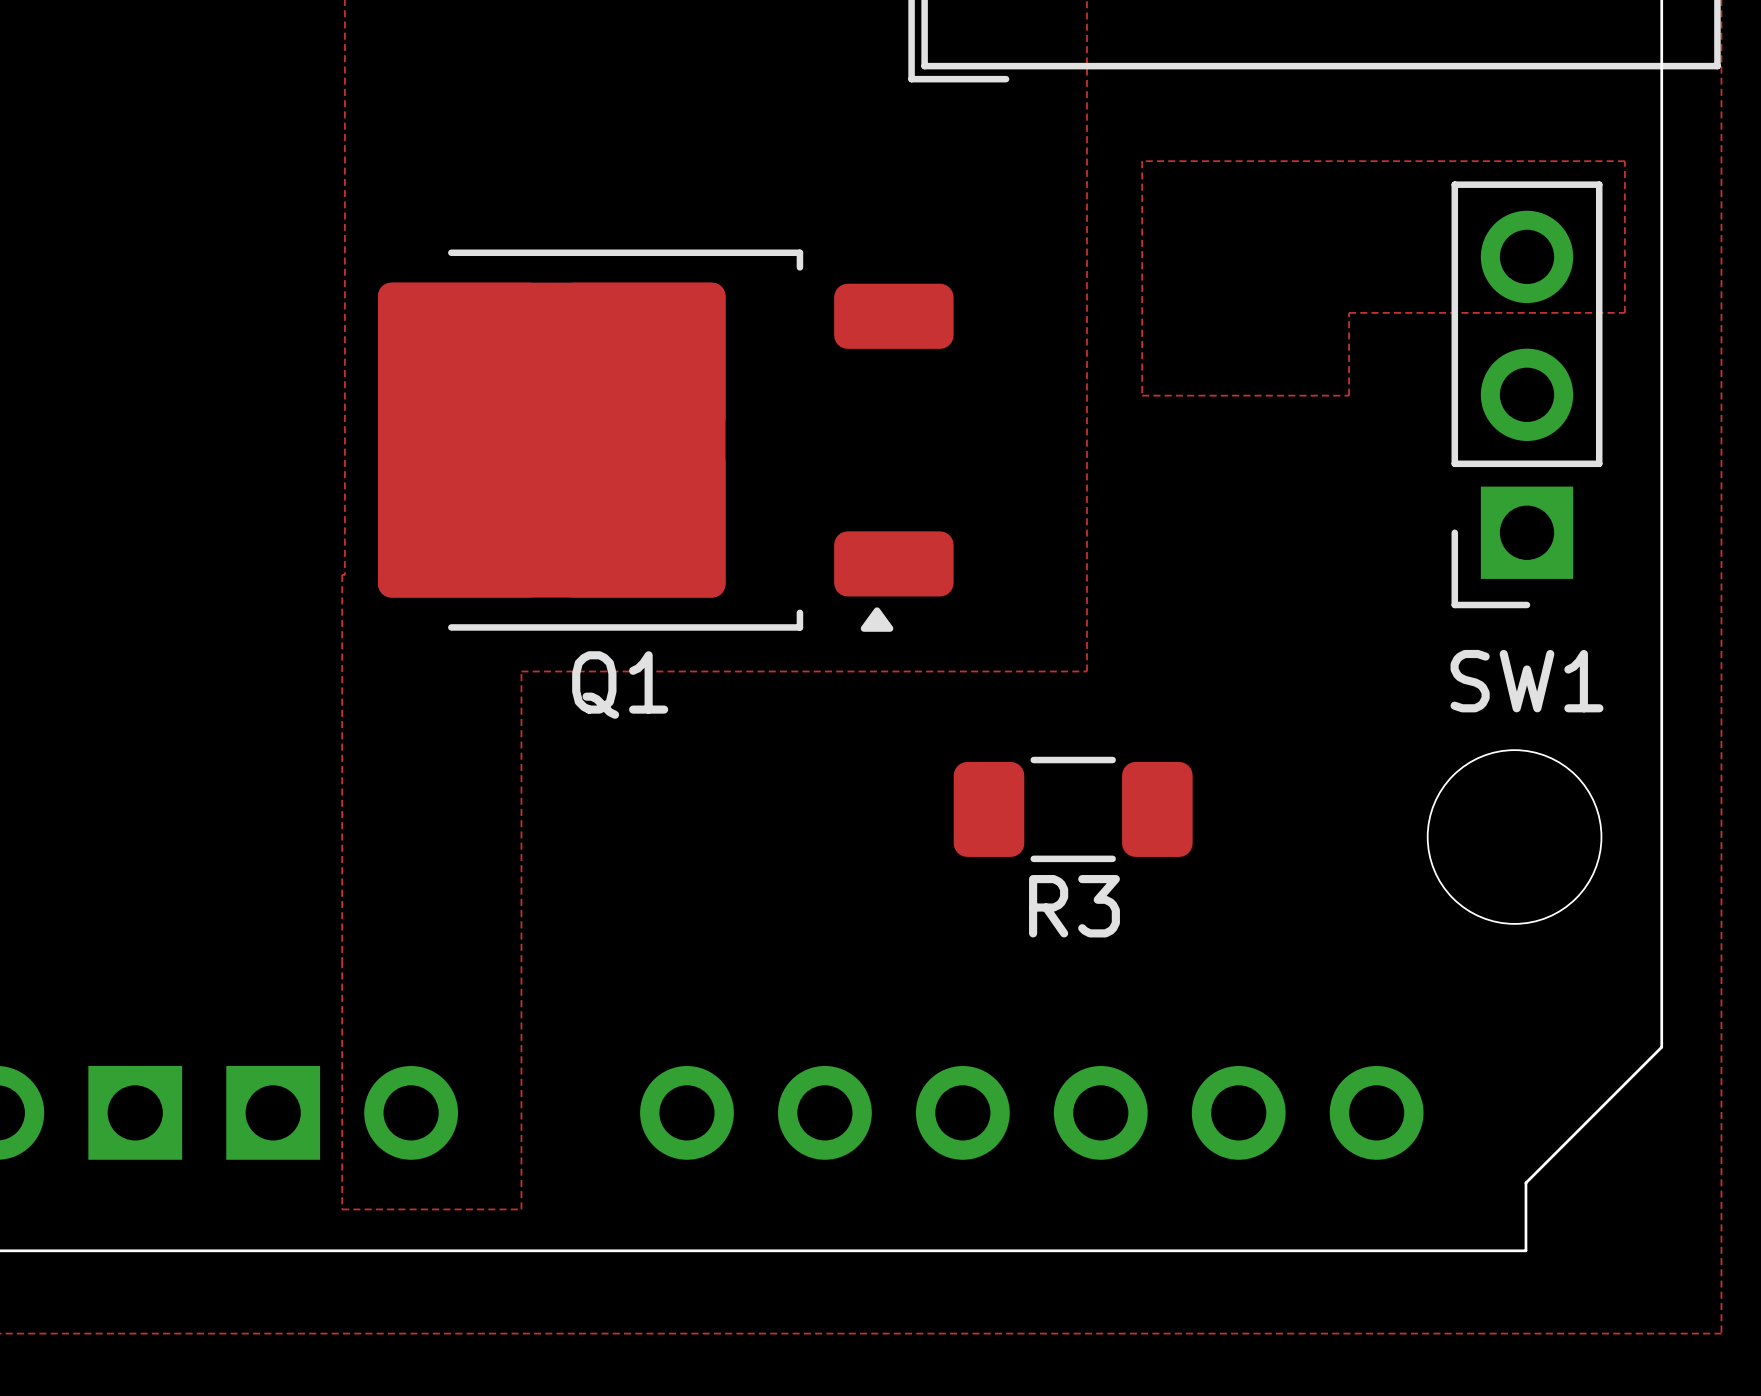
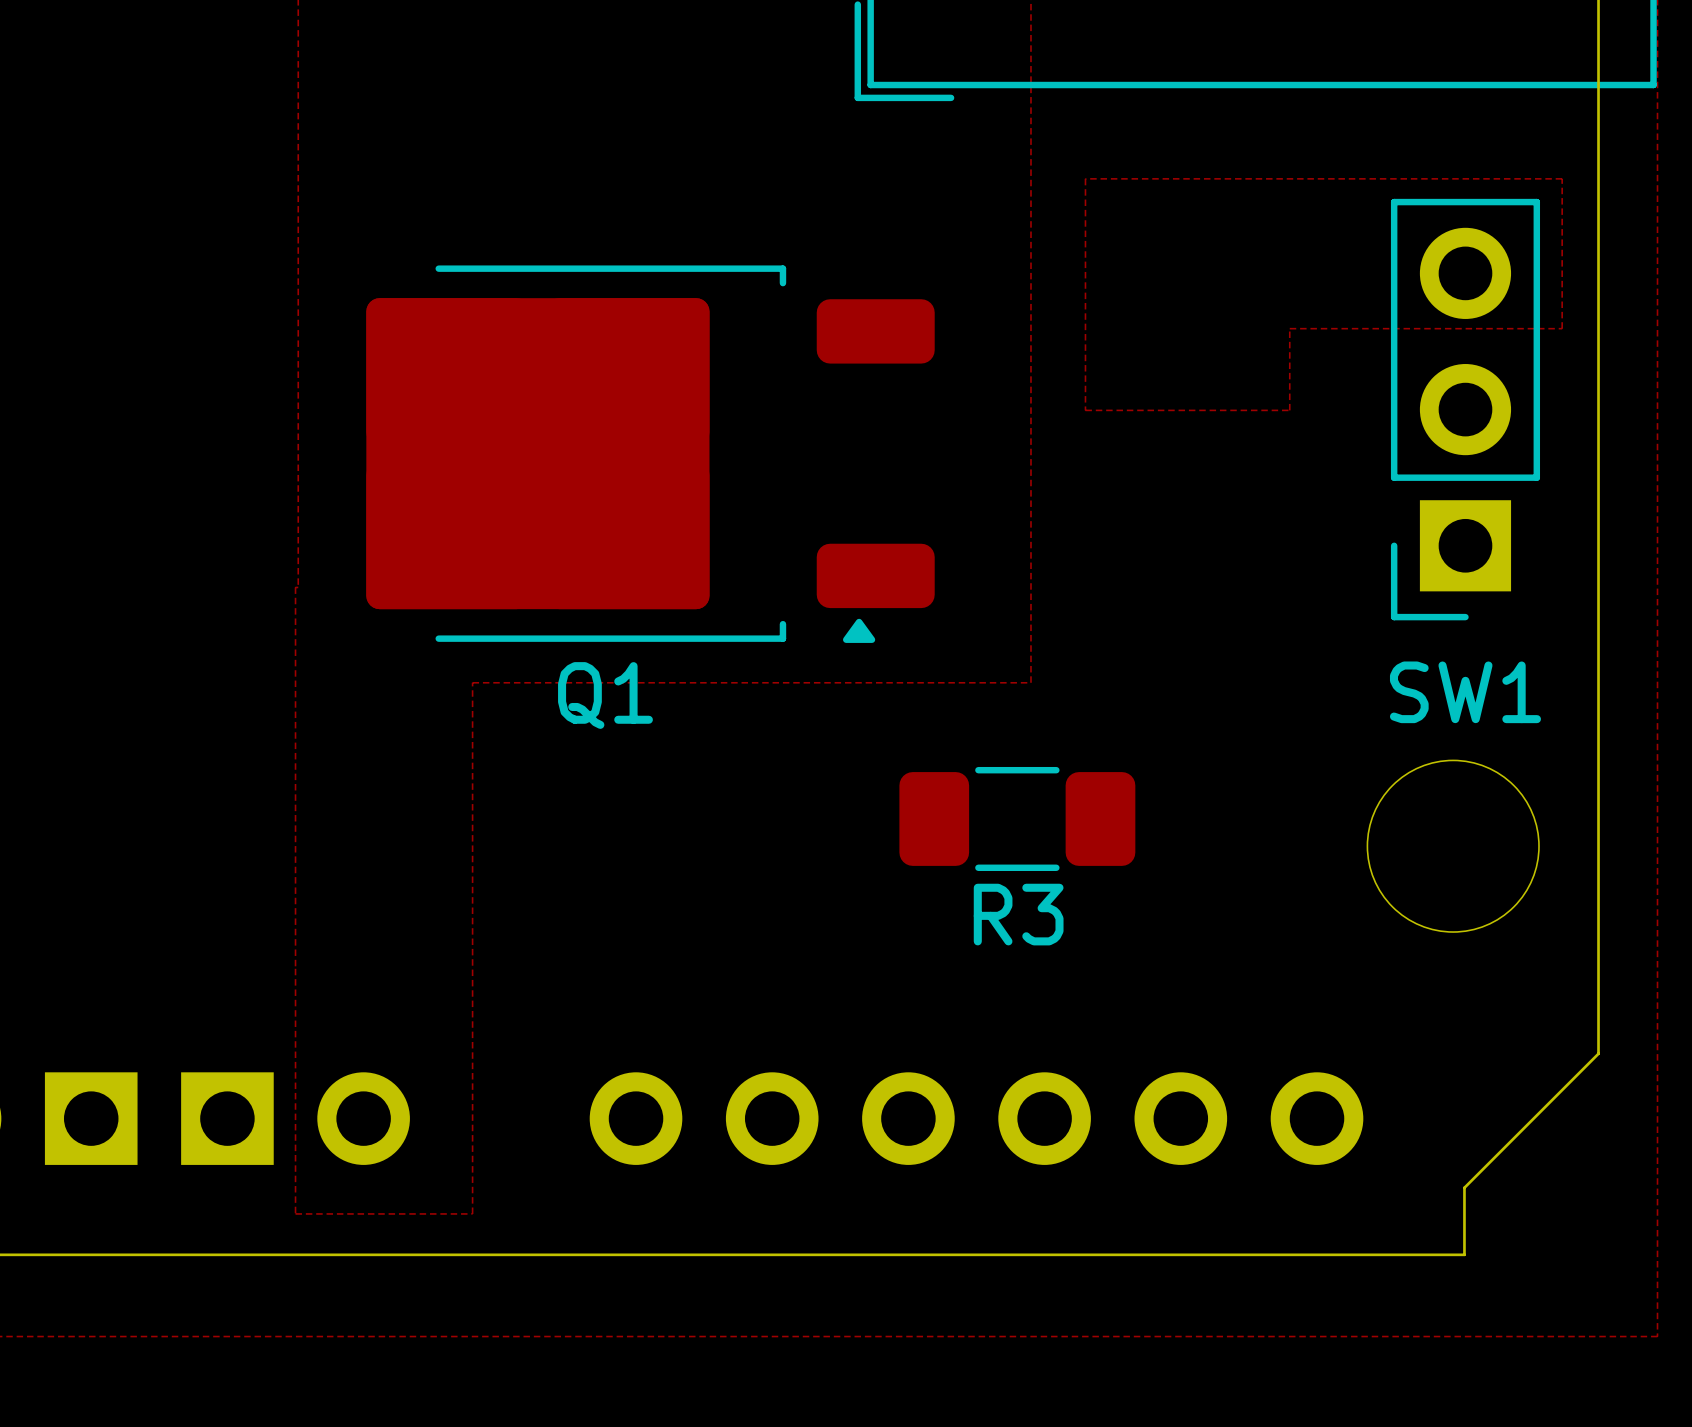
Q1 position: (665, 440) -> (650, 454)

